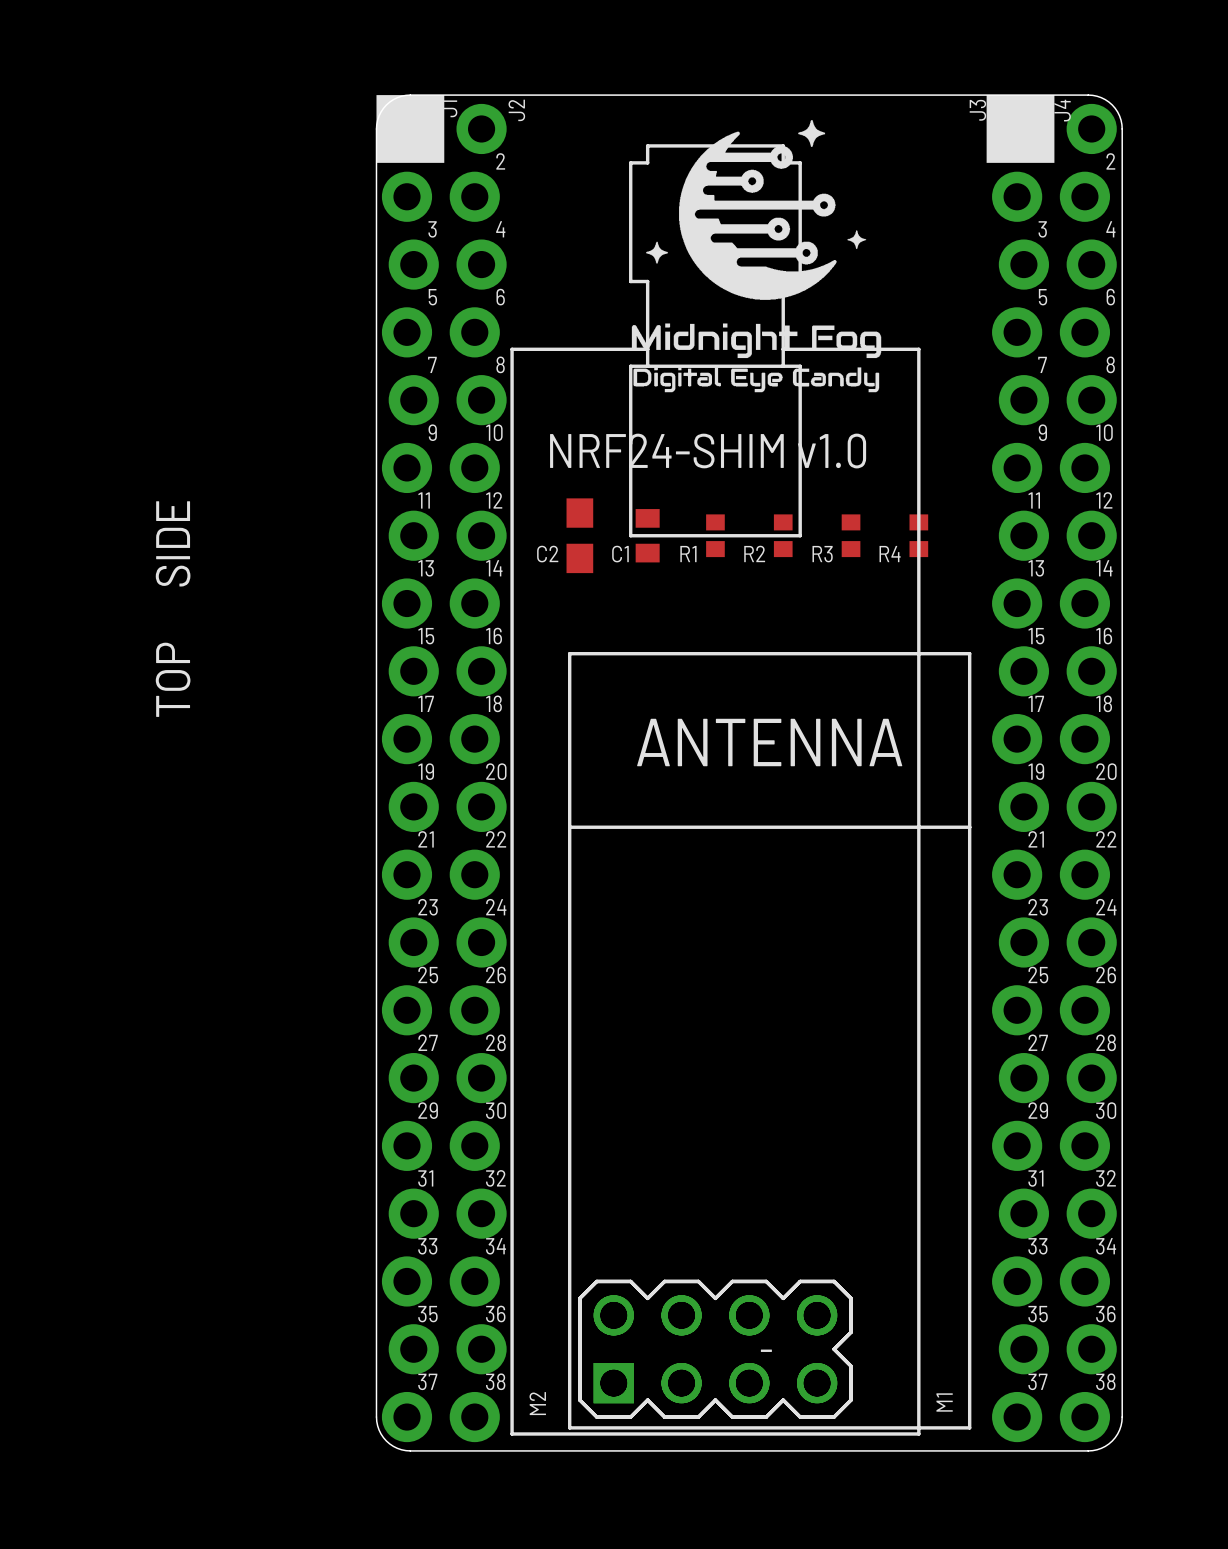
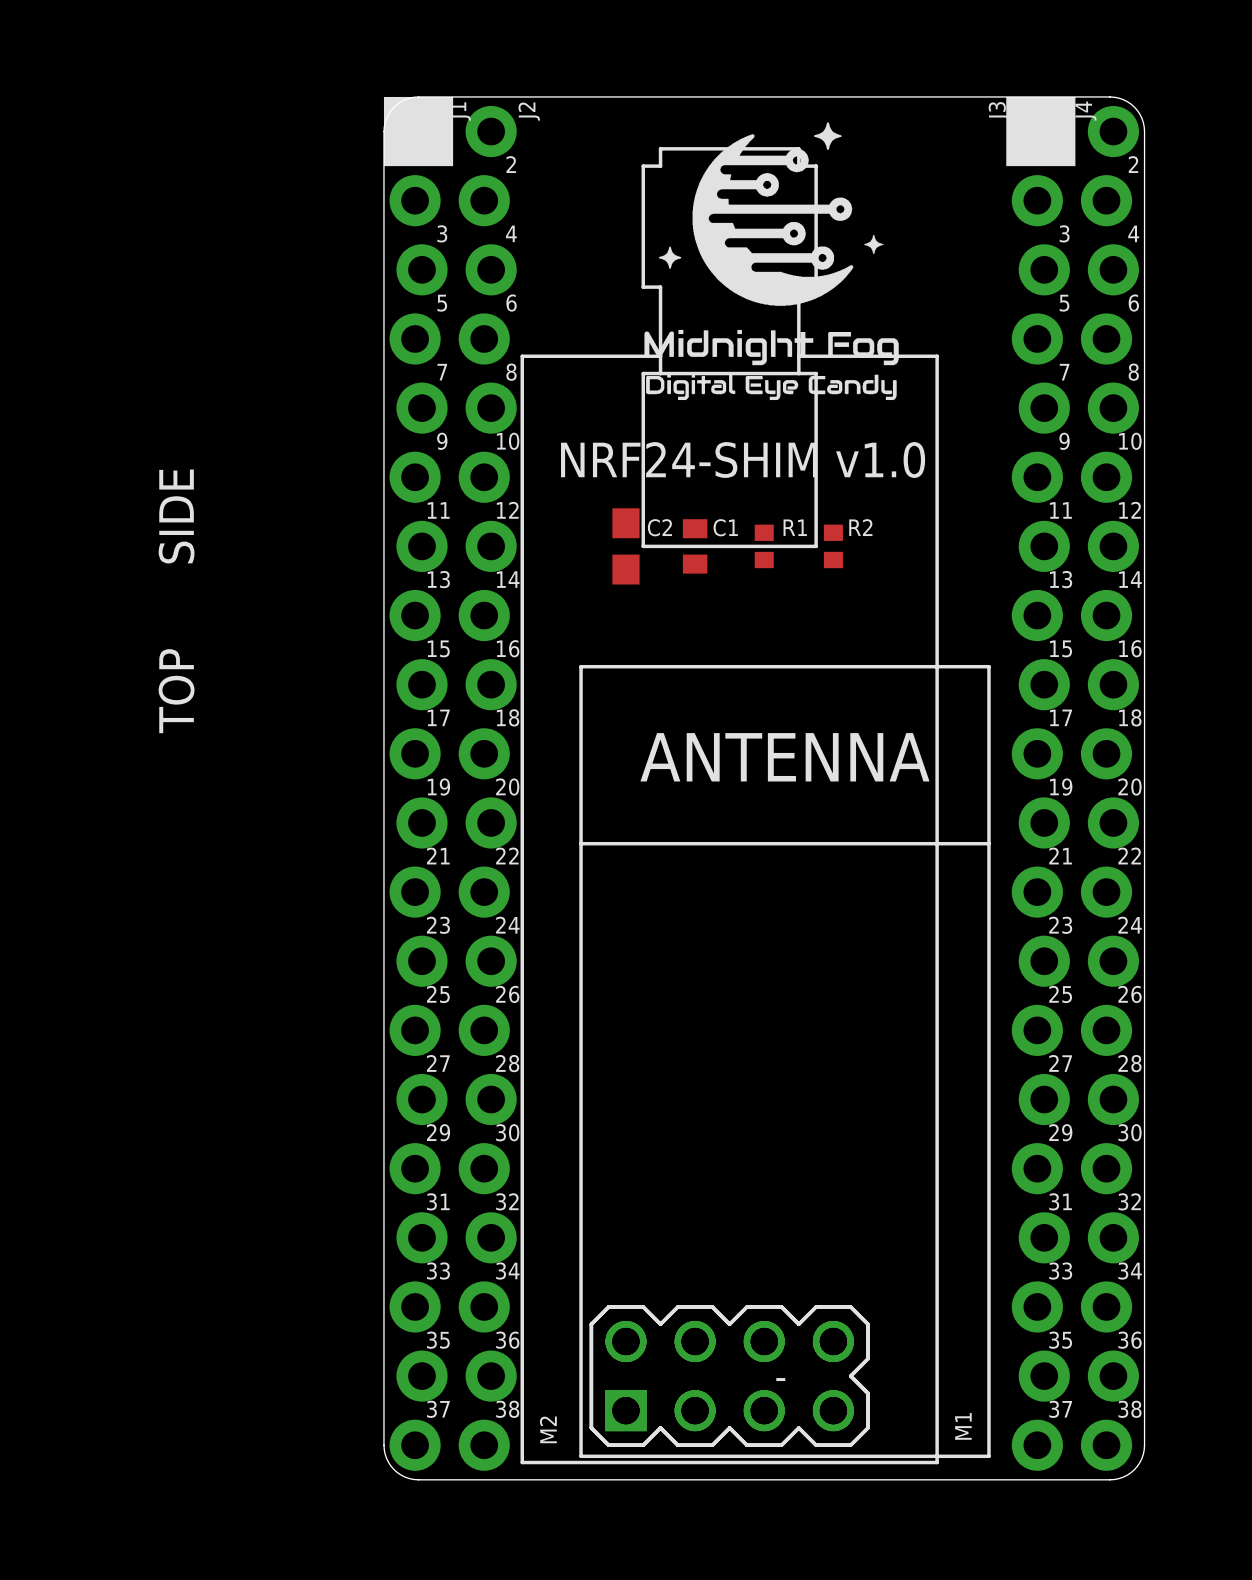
C2 position: (579, 535) -> (625, 546)
C1 position: (647, 535) -> (695, 546)
R1 position: (715, 535) -> (764, 546)
R2 position: (783, 535) -> (833, 546)
R3: (851, 535) -> none
R4: (918, 535) -> none
R2 name position: R2 (754, 553) -> R2 (860, 527)
C2 name position: C2 (547, 554) -> C2 (659, 527)
C1 name position: C1 (620, 554) -> C1 (725, 527)
R1 name position: R1 (688, 554) -> R1 (795, 527)

